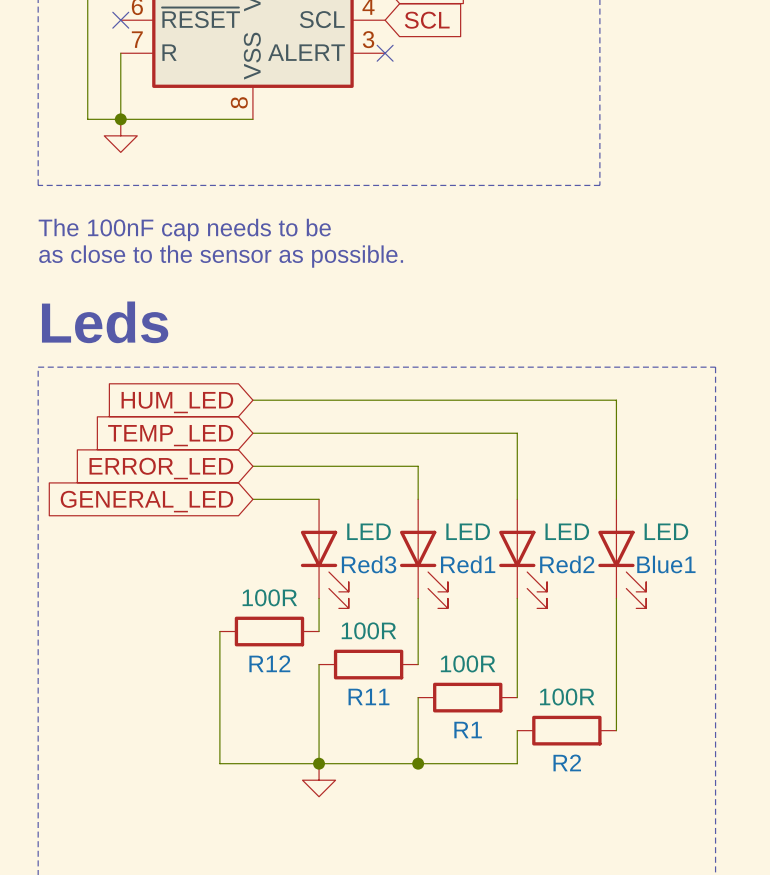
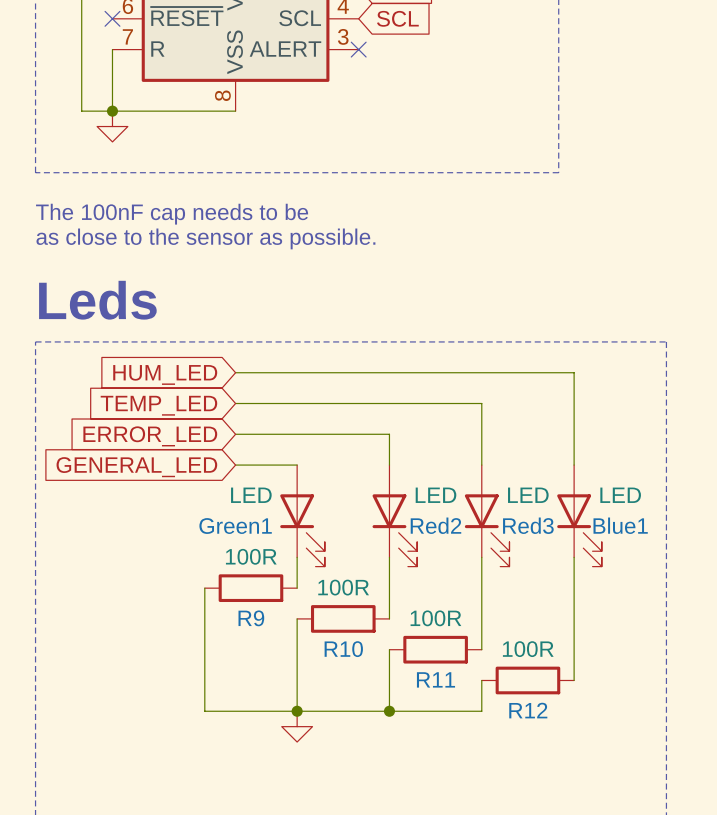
Red3 value position: LED (369, 531) -> LED (251, 495)
Red3 name: Red3 (369, 564) -> Green1 (235, 526)
Red1 name: Red1 (468, 564) -> Red2 (435, 525)
Red2 name: Red2 (567, 564) -> Red3 (528, 525)
R12 name: R12 (269, 663) -> R9 (251, 618)
R11 name: R11 (369, 696) -> R10 (343, 649)
R1 name: R1 (468, 730) -> R11 (435, 679)
R2 name: R2 (567, 762) -> R12 (528, 710)

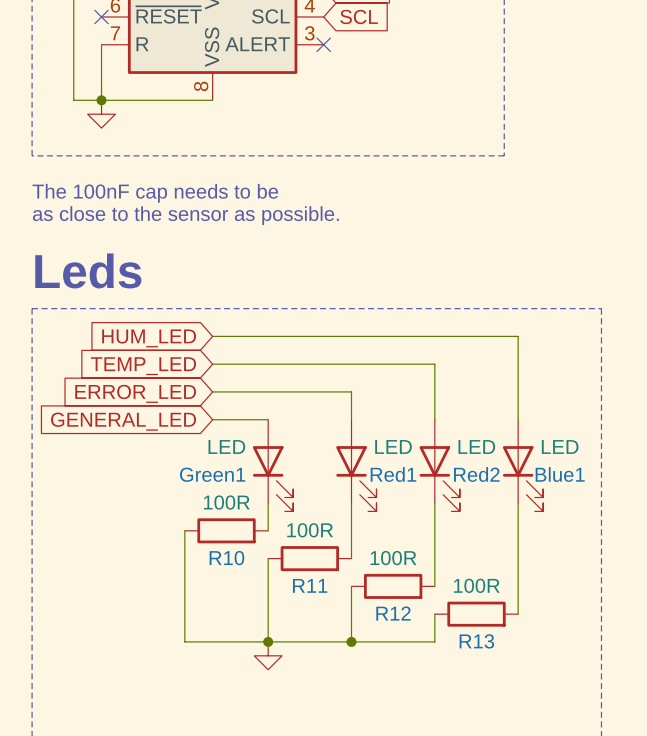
Red2 name: Red2 (435, 525) -> Red1 (393, 474)
Red3 name: Red3 (528, 525) -> Red2 (476, 474)
R9 name: R9 (251, 618) -> R10 (226, 558)
R10 name: R10 (343, 649) -> R11 (310, 585)
R11 name: R11 (435, 679) -> R12 (393, 613)
R12 name: R12 (528, 710) -> R13 (476, 641)

